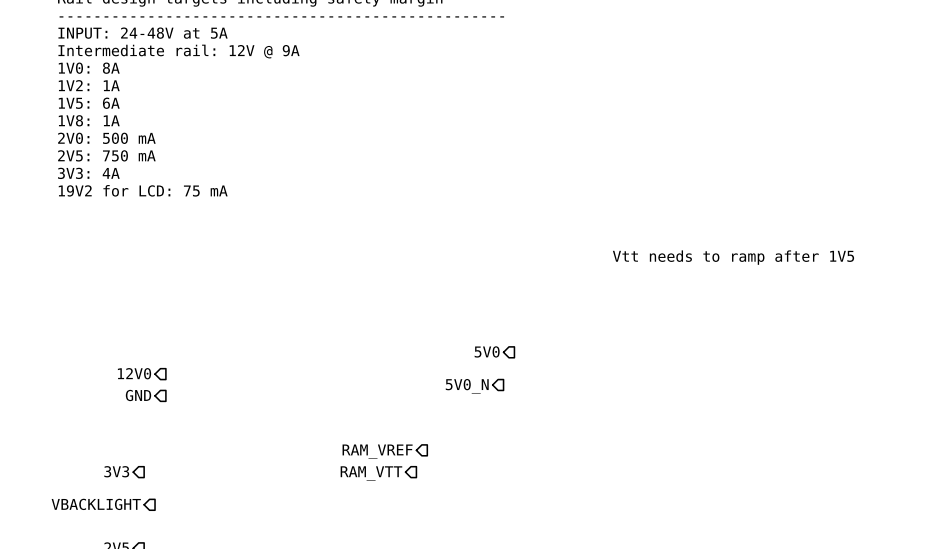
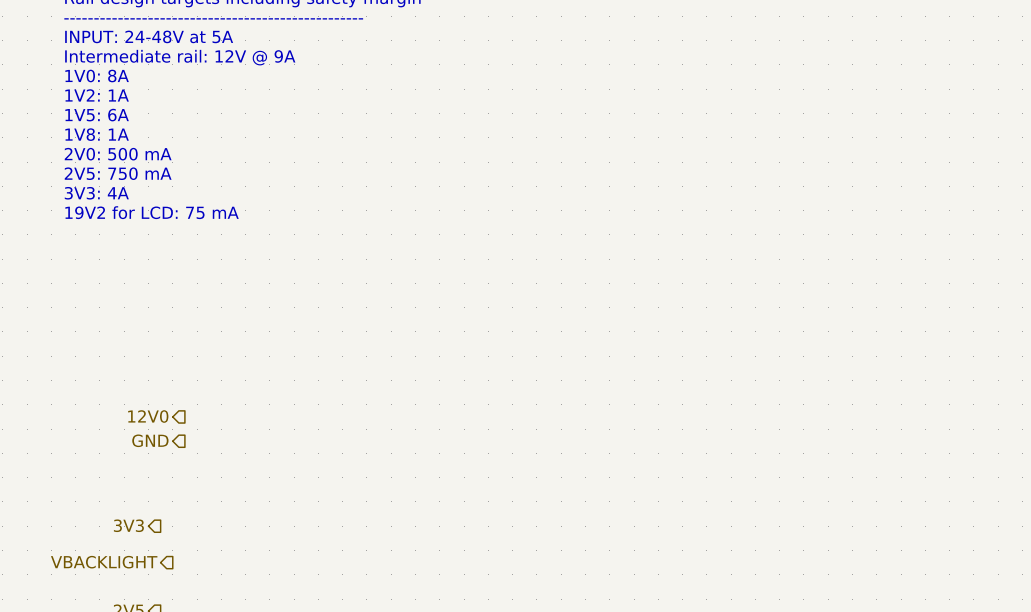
text: Vtt needs to ramp after 1V5 (733, 257) -> none
hierarchical label: 5V0 (487, 351) -> none
hierarchical label: 5V0_N (467, 386) -> none
hierarchical label: RAM_VREF (377, 451) -> none
hierarchical label: RAM_VTT (371, 473) -> none

